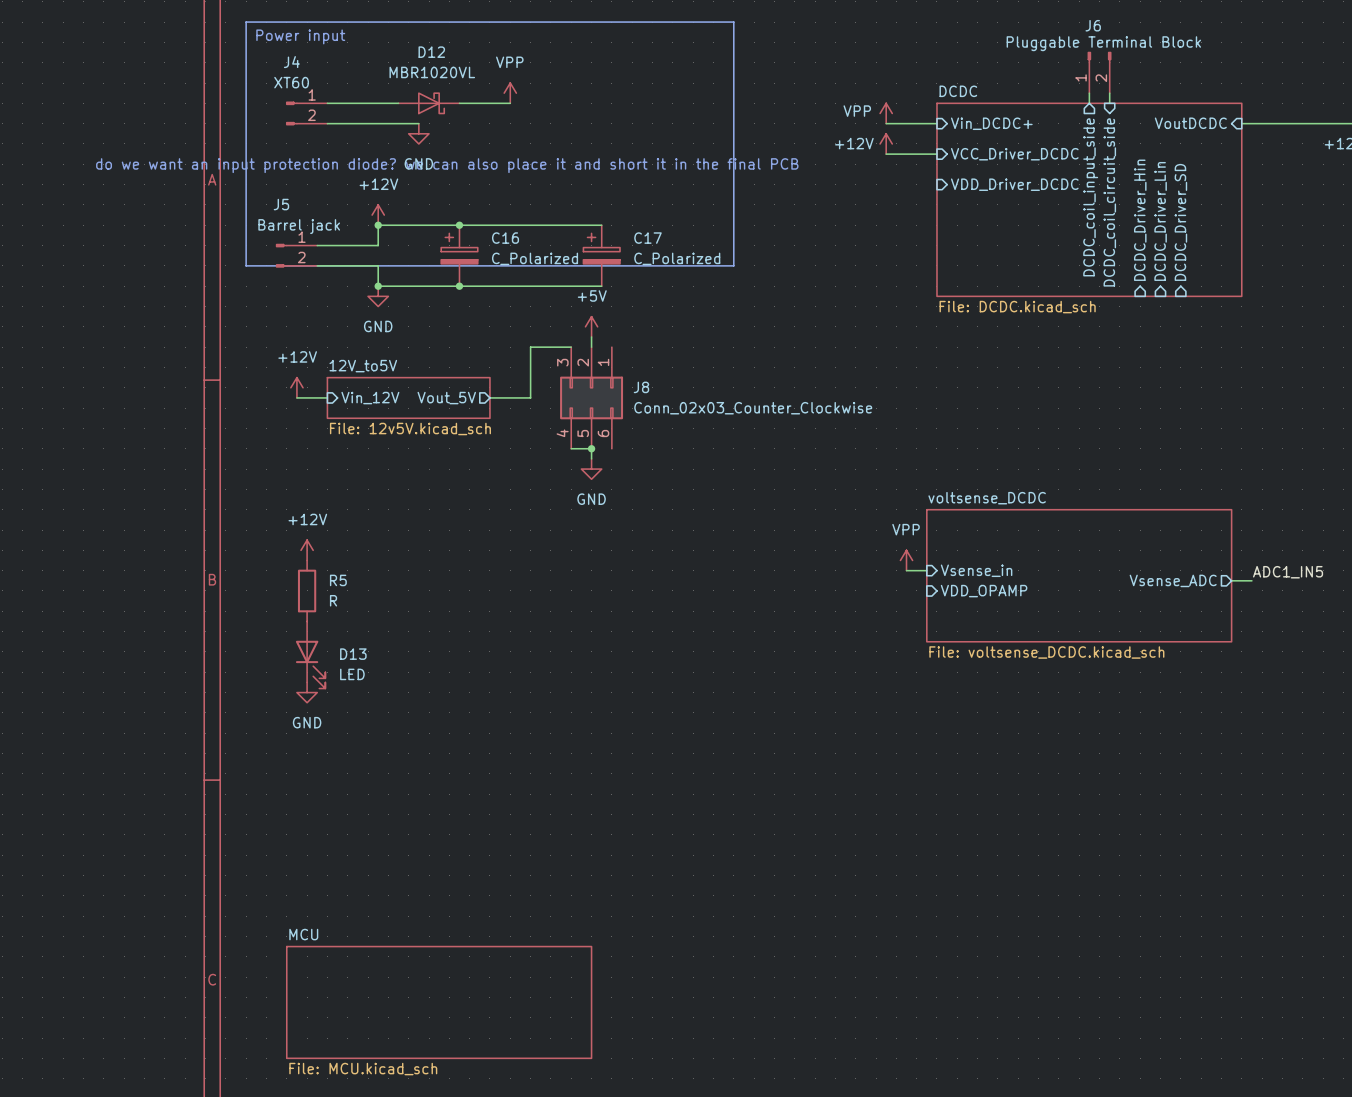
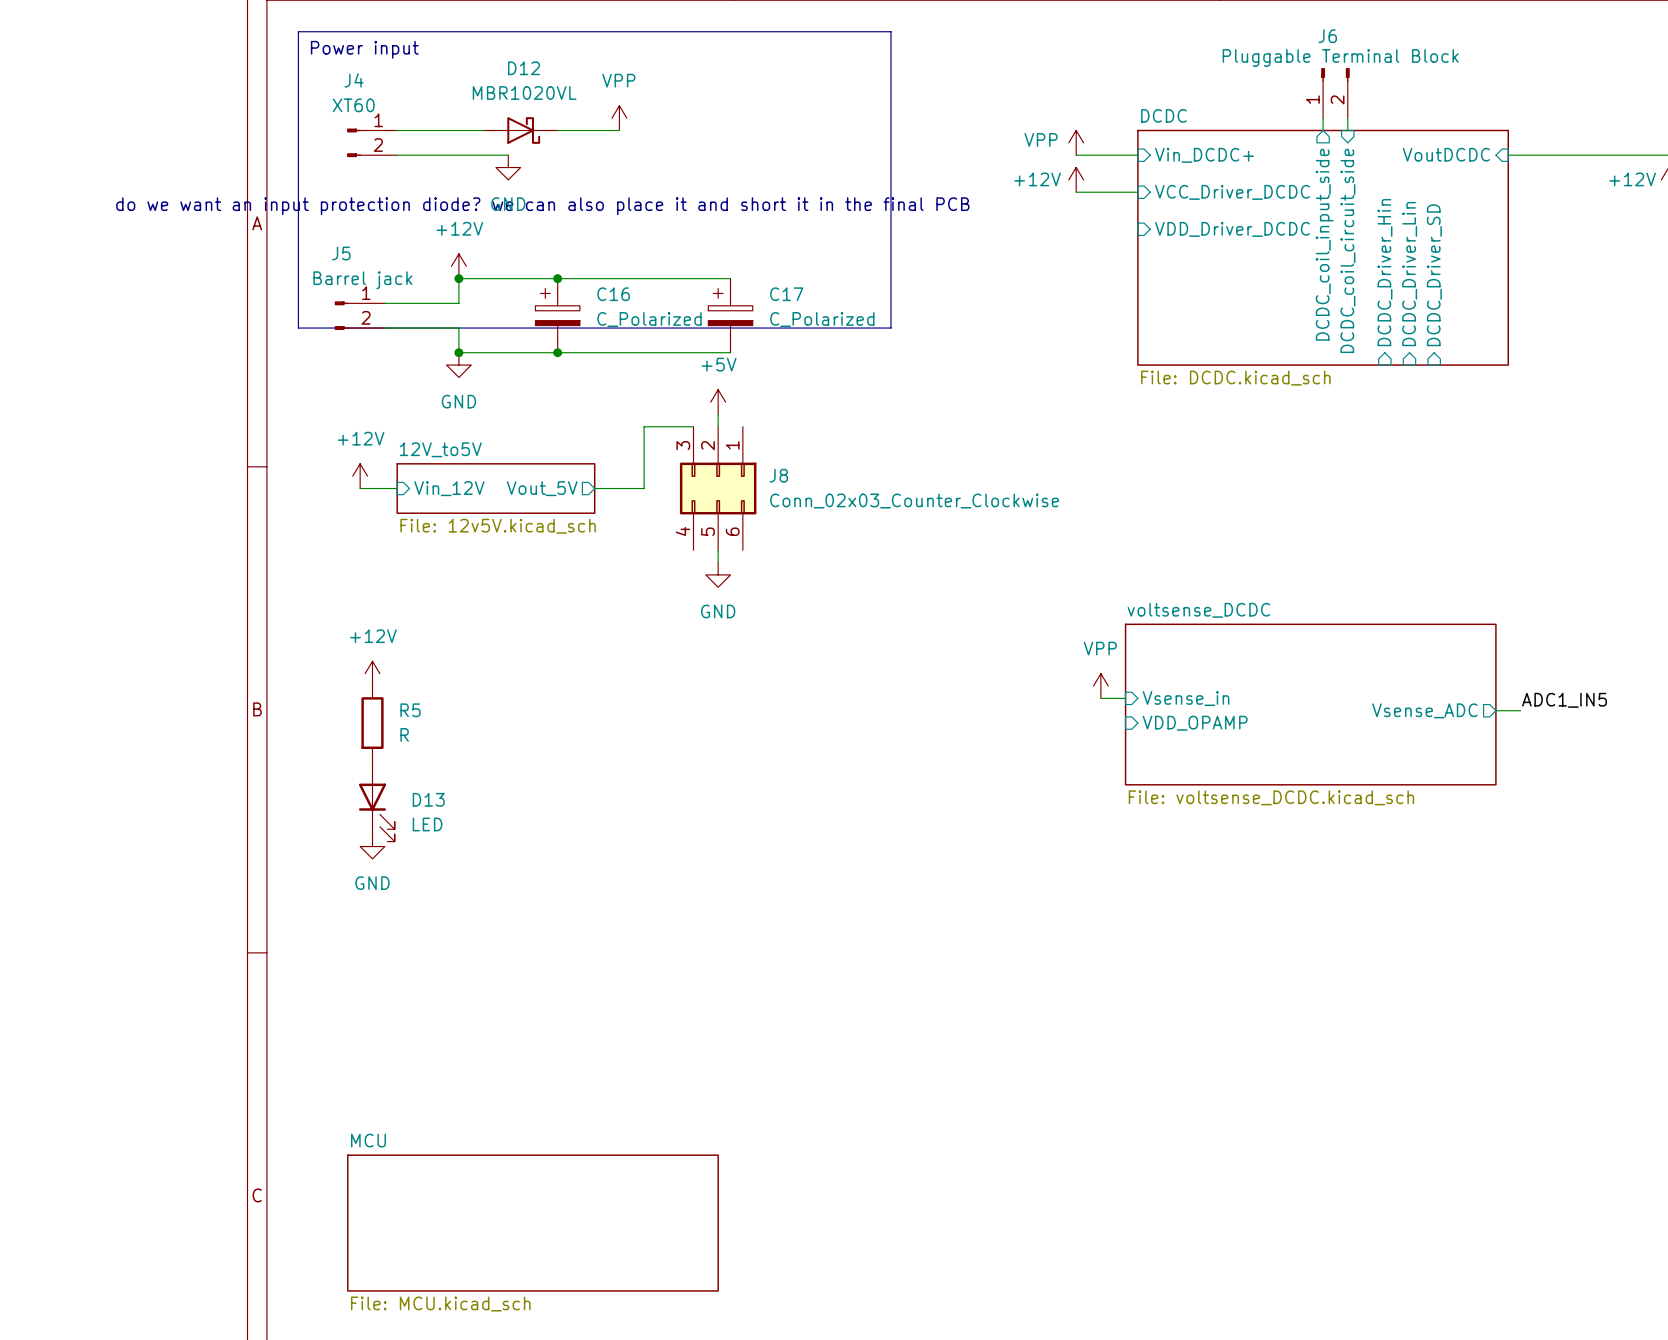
wire: (571, 448) (591, 448) -> none
junction: (591, 448) -> none

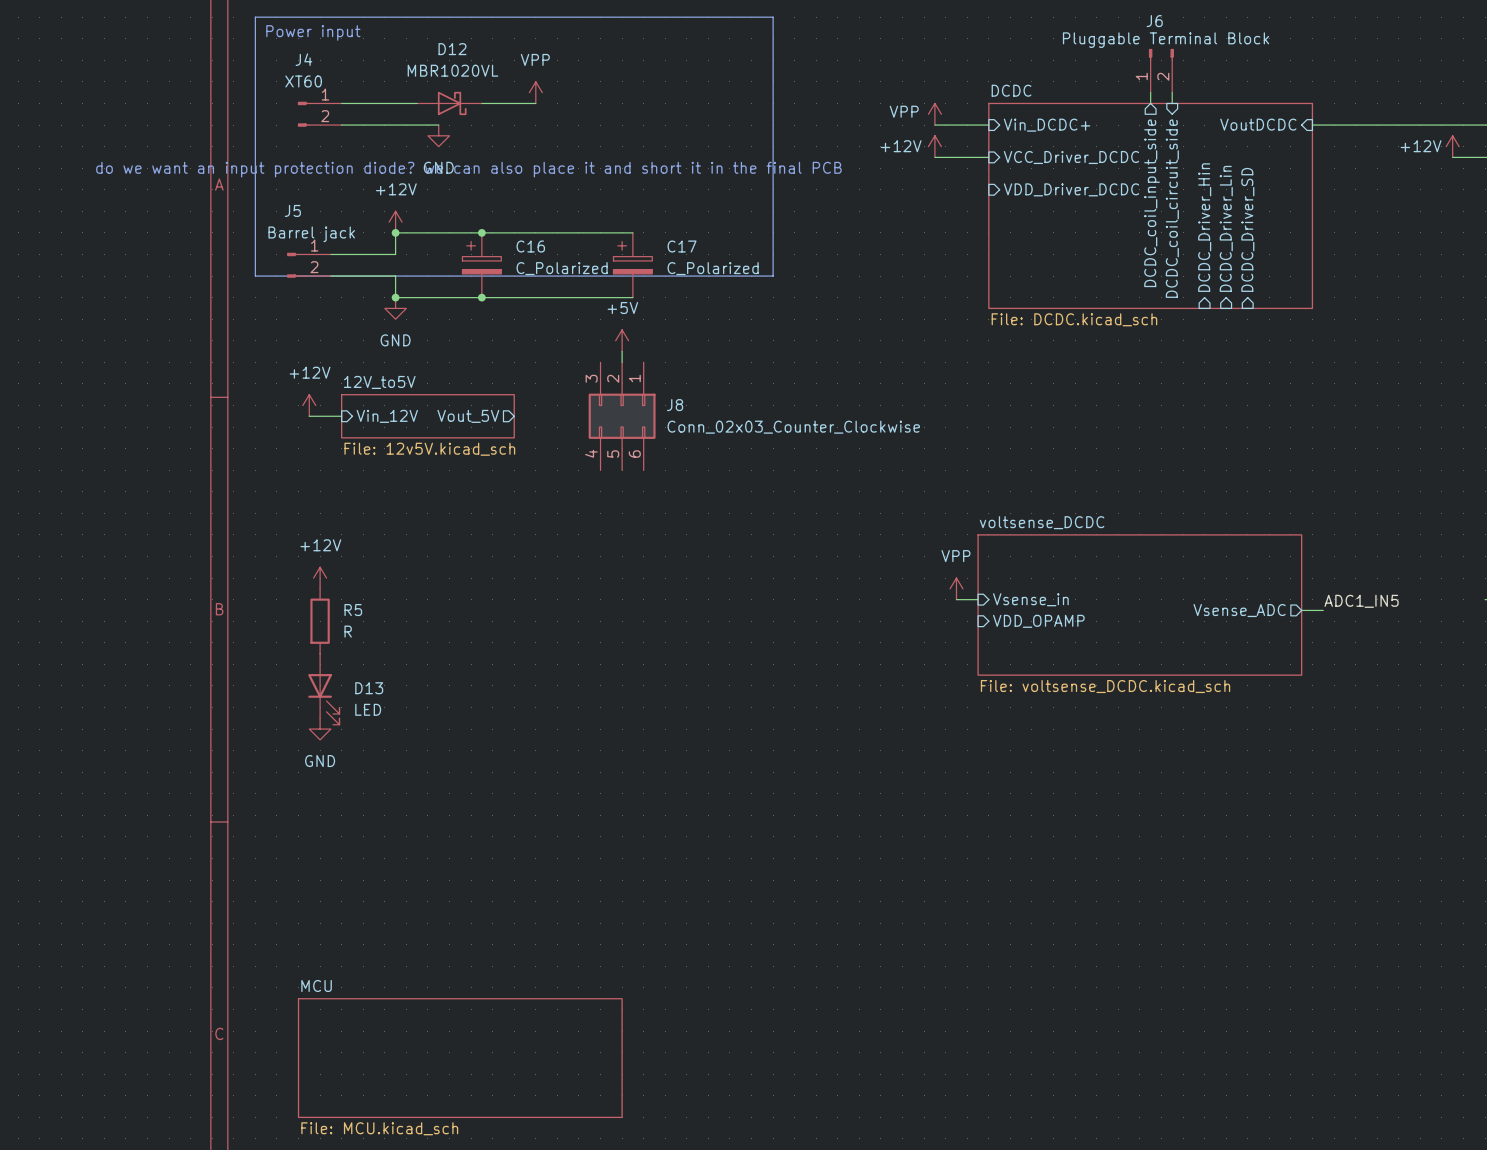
wire: (693, 426) (644, 426) (644, 488) (594, 488) -> none
wire: (718, 550) (718, 562) -> none
power symbol: GND (718, 574) -> none

